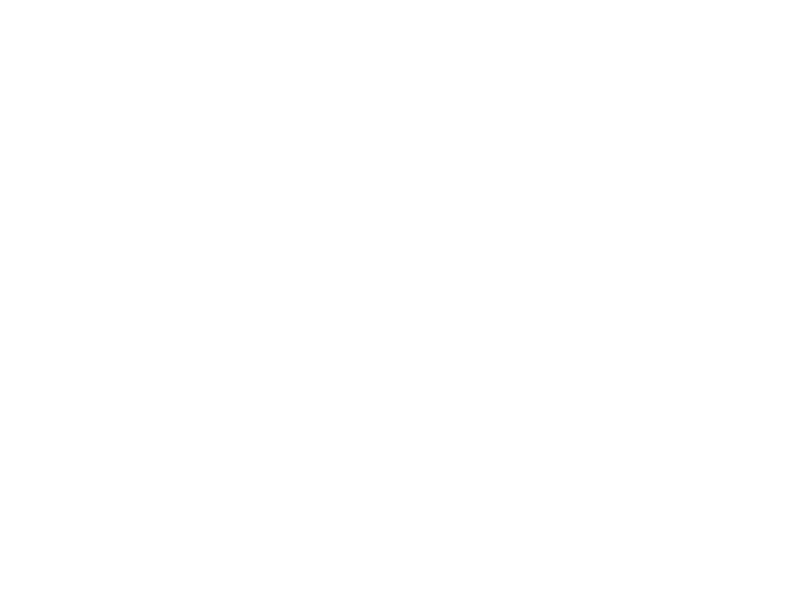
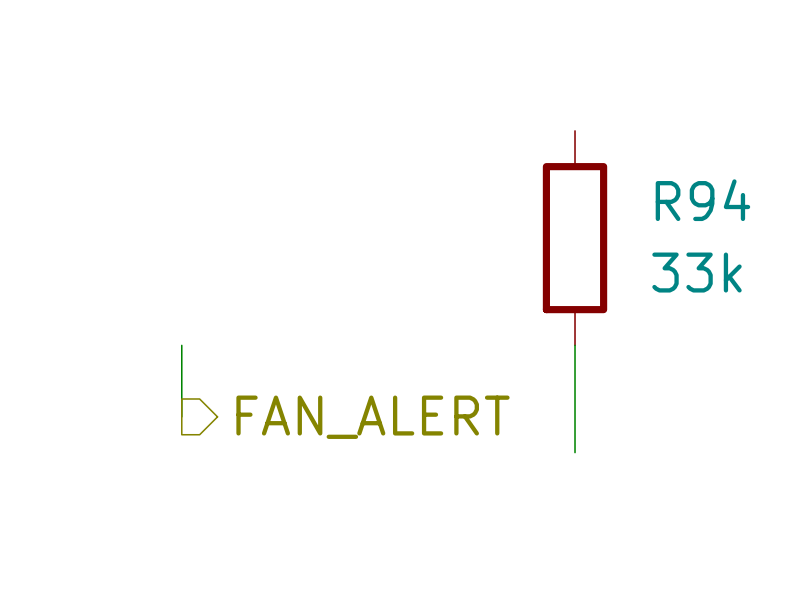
R94: none -> 33k (575, 238)
wire: none -> (181, 345) (181, 416)
wire: none -> (575, 345) (575, 452)
hierarchical label: none -> FAN_ALERT (372, 417)

